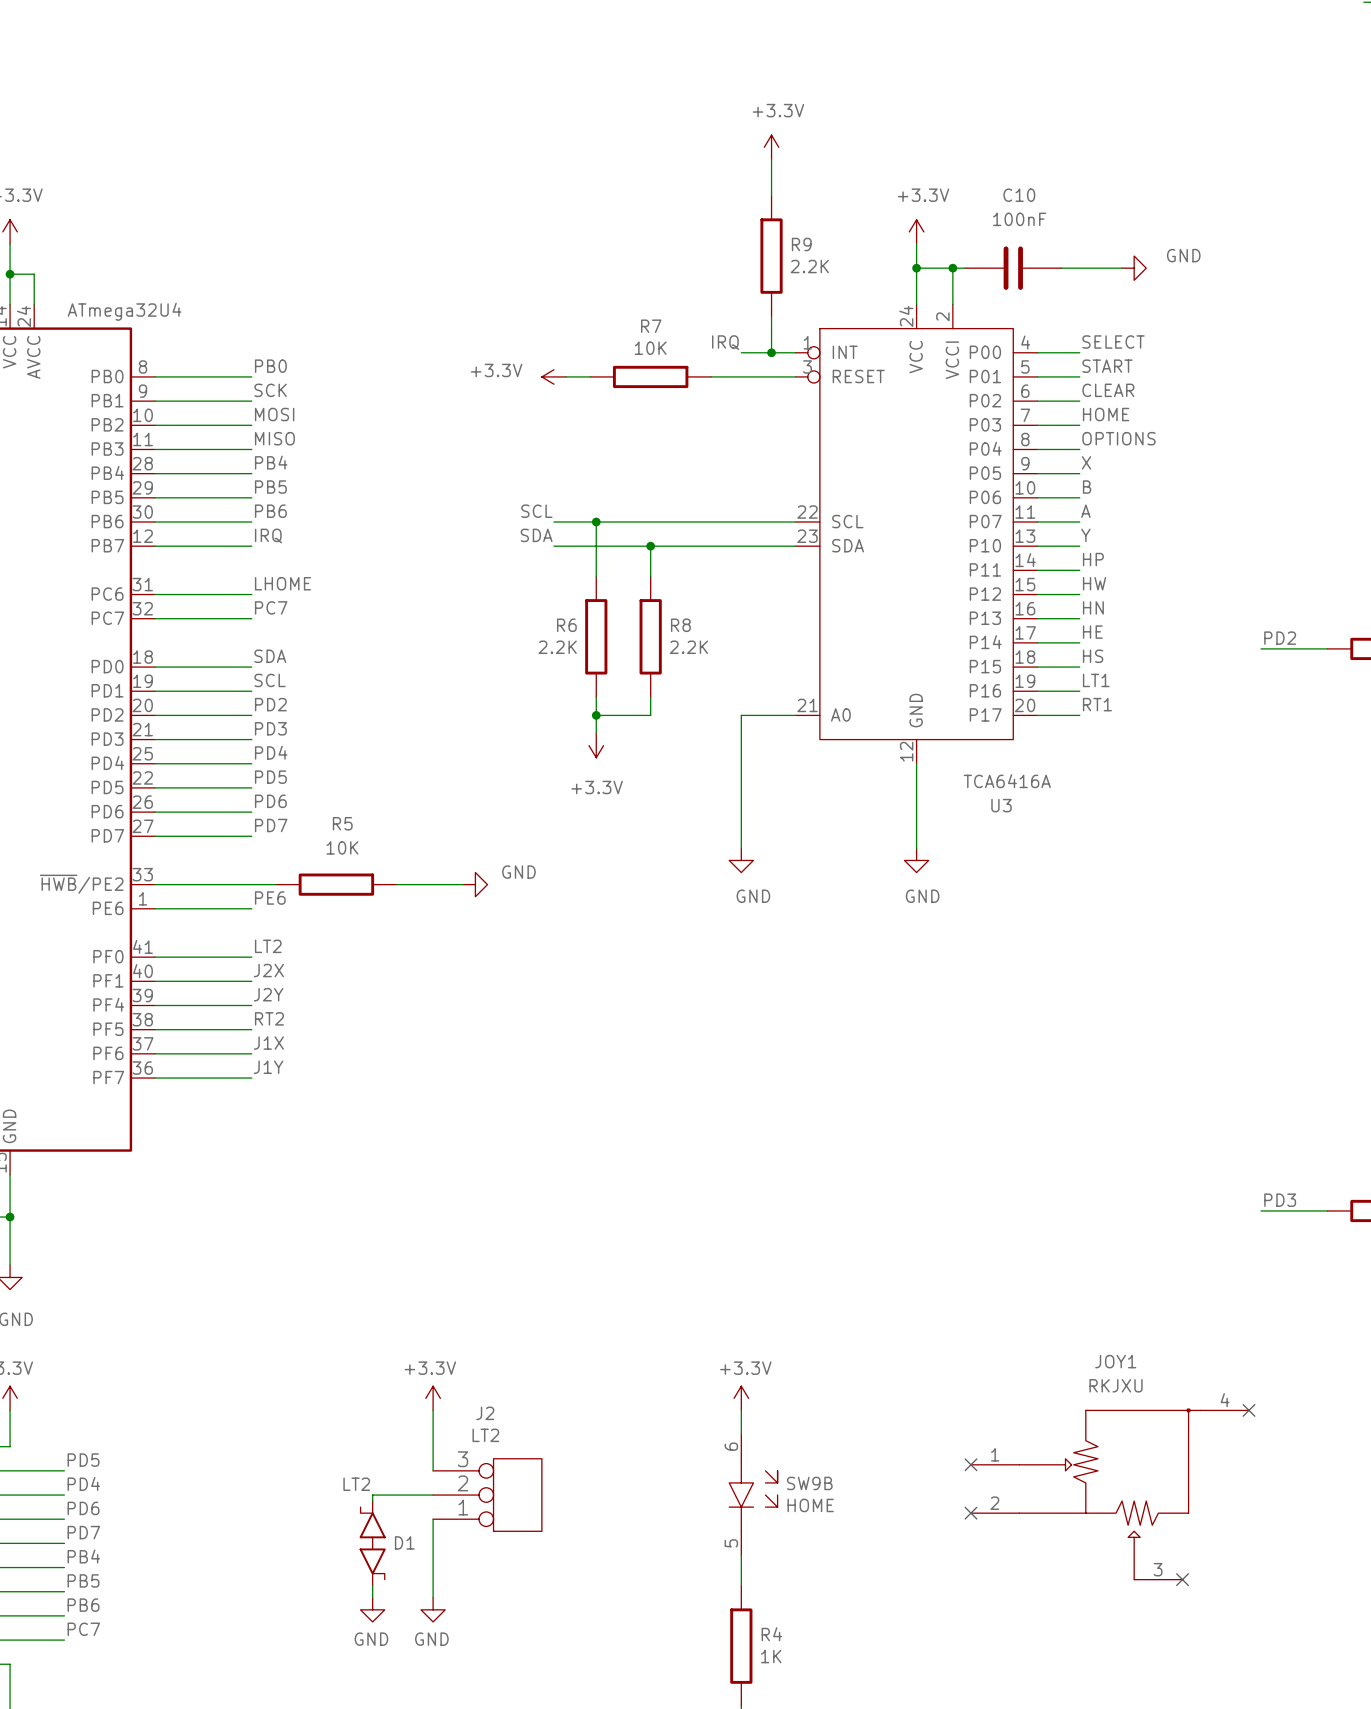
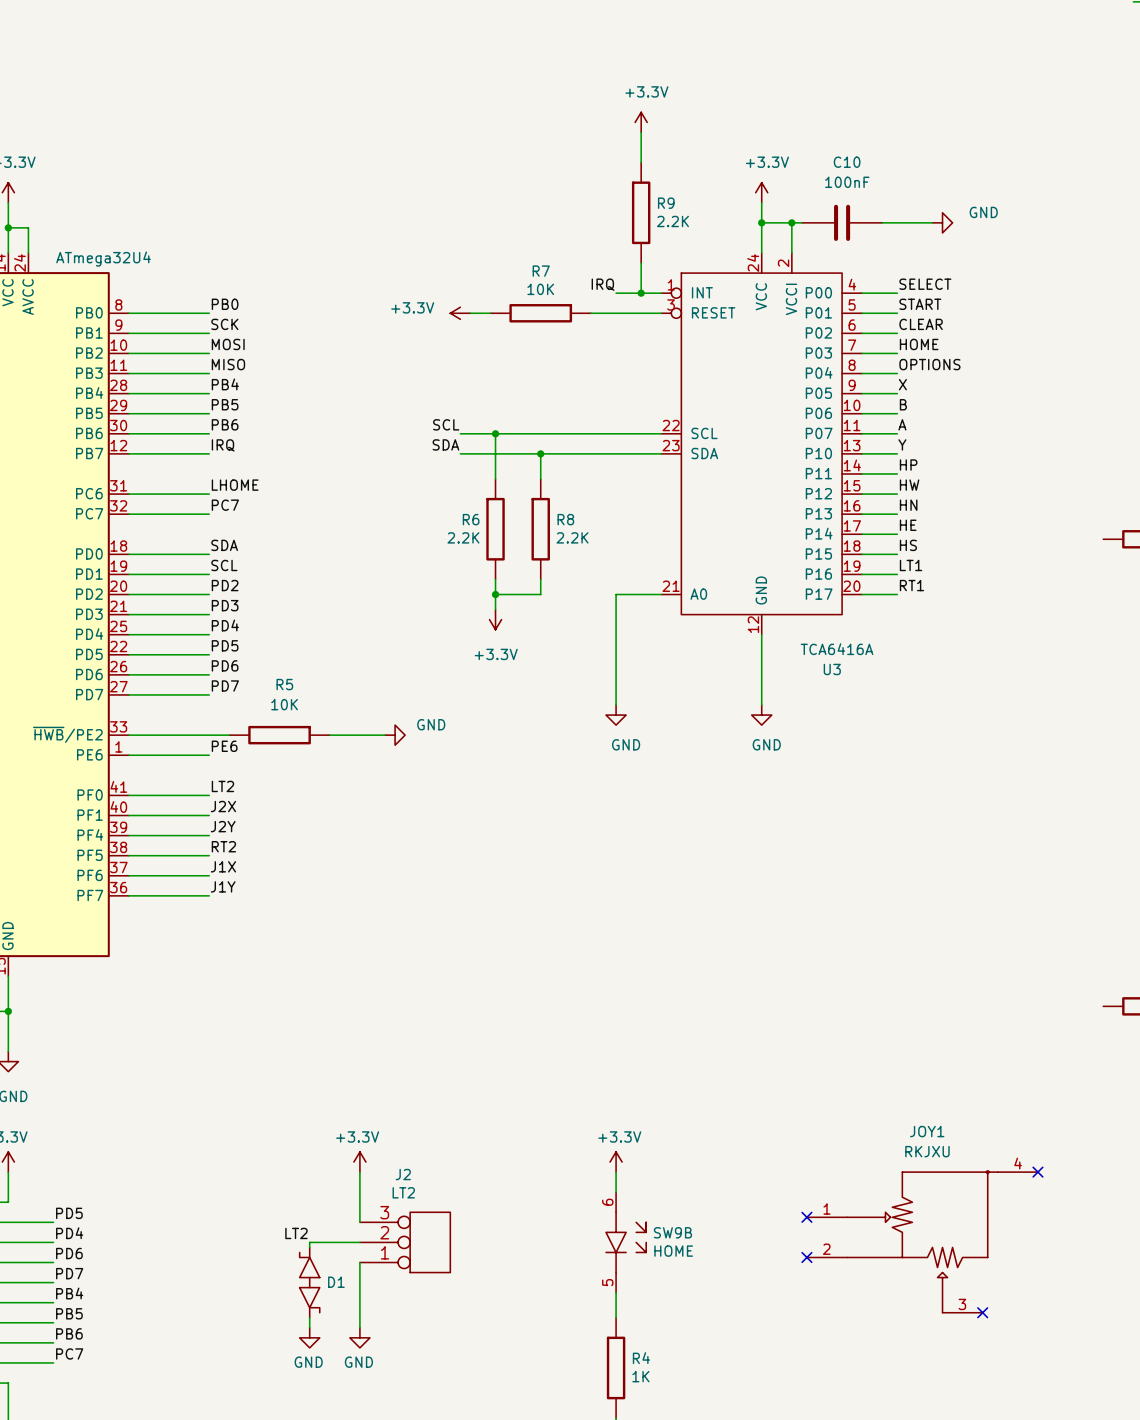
label: PD2 (1280, 638) -> none
wire: (1261, 648) (1327, 648) -> none
label: PD3 (1280, 1200) -> none
wire: (1261, 1210) (1327, 1210) -> none

